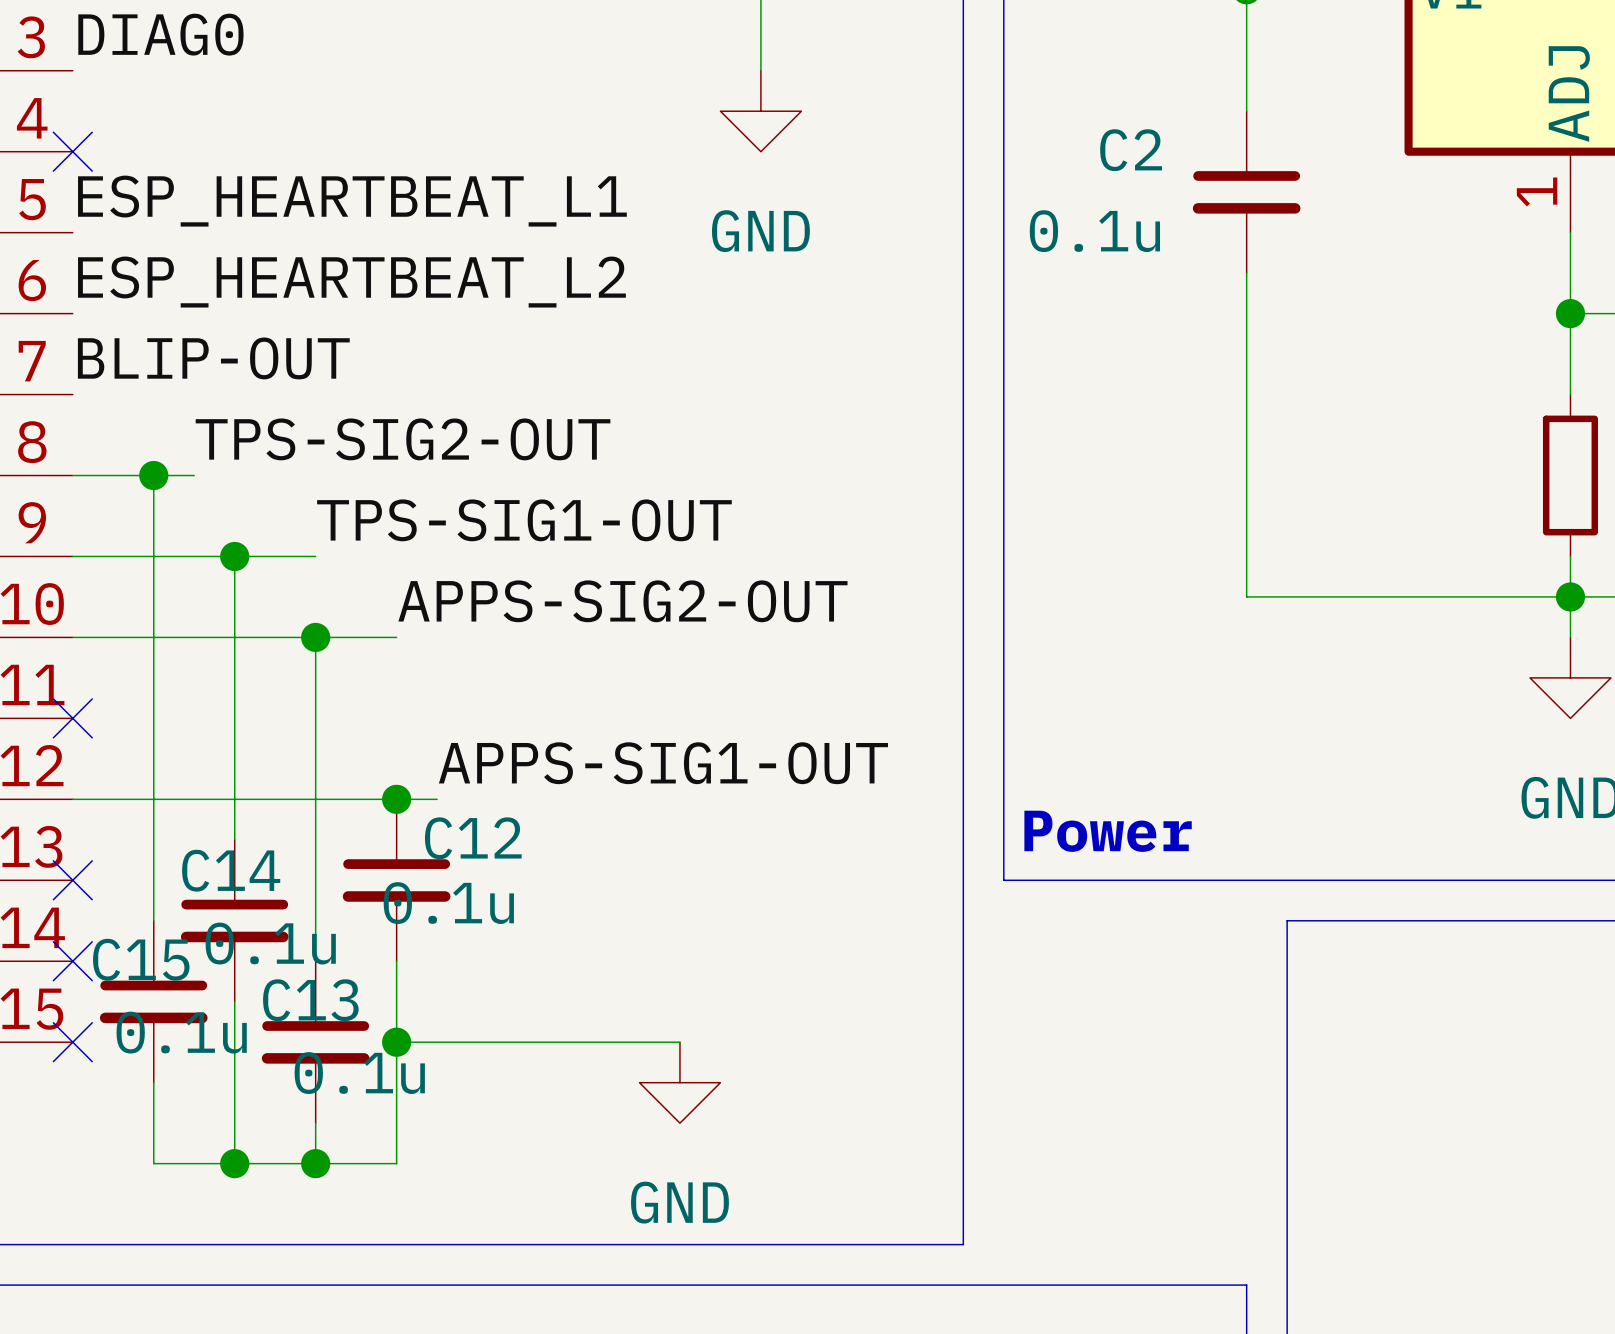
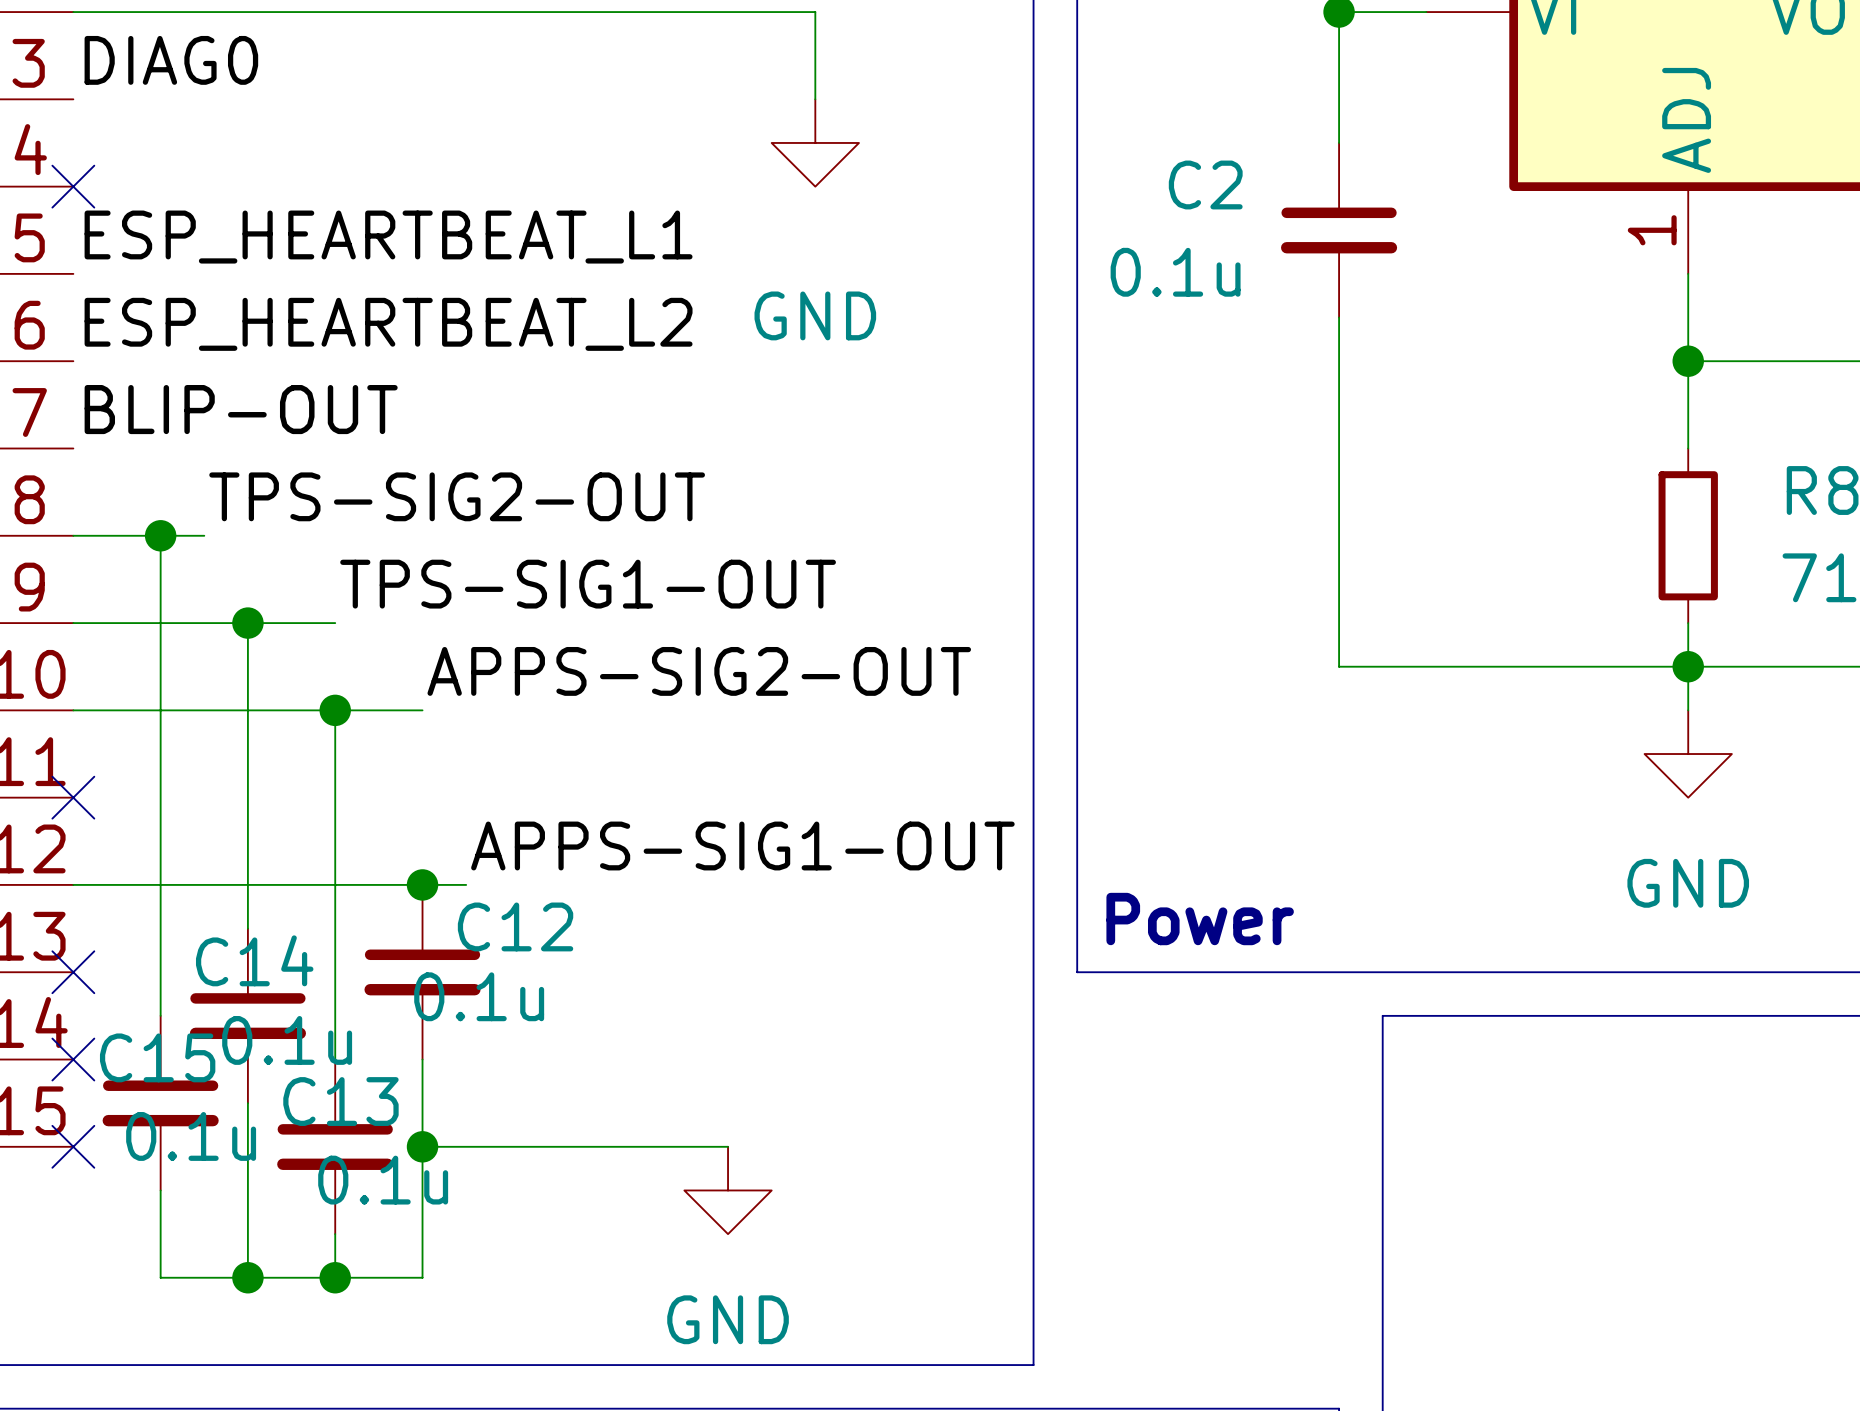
power symbol text position: GND (760, 231) -> GND (815, 315)

